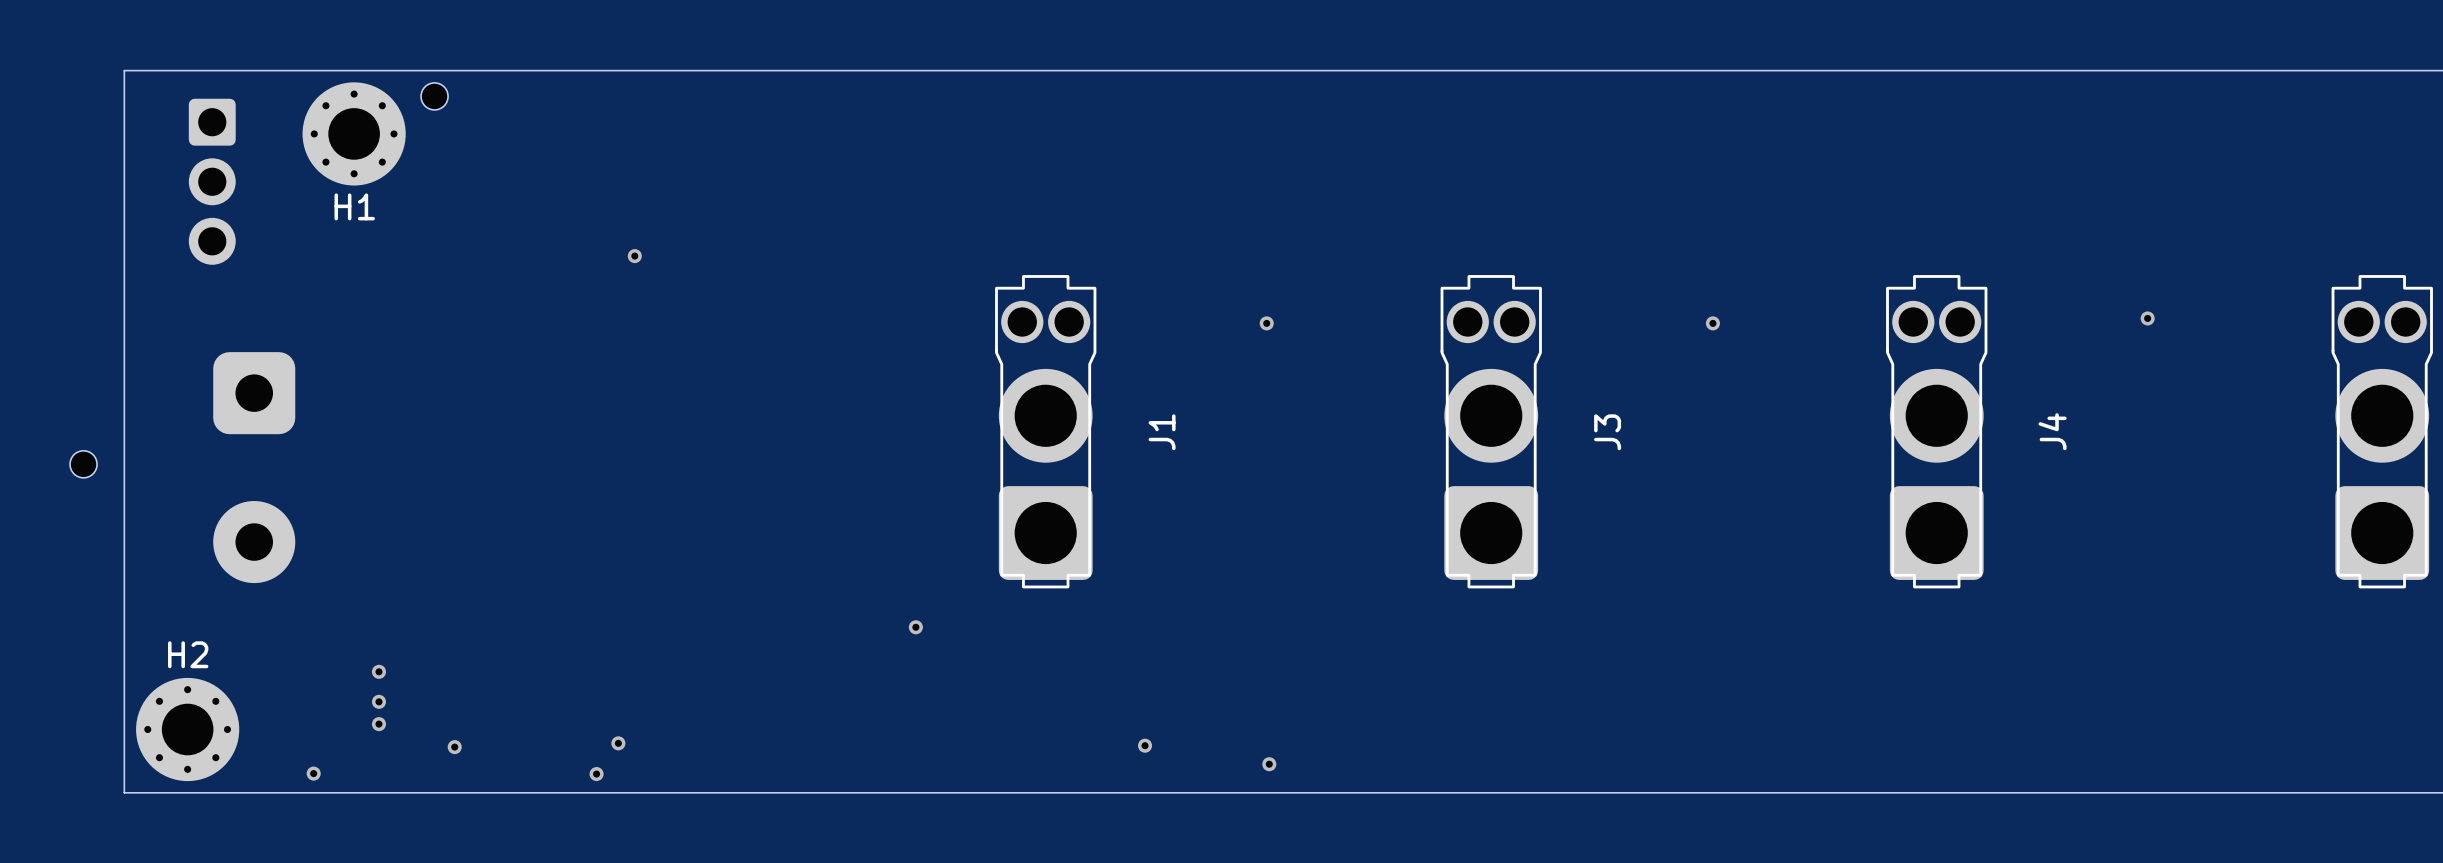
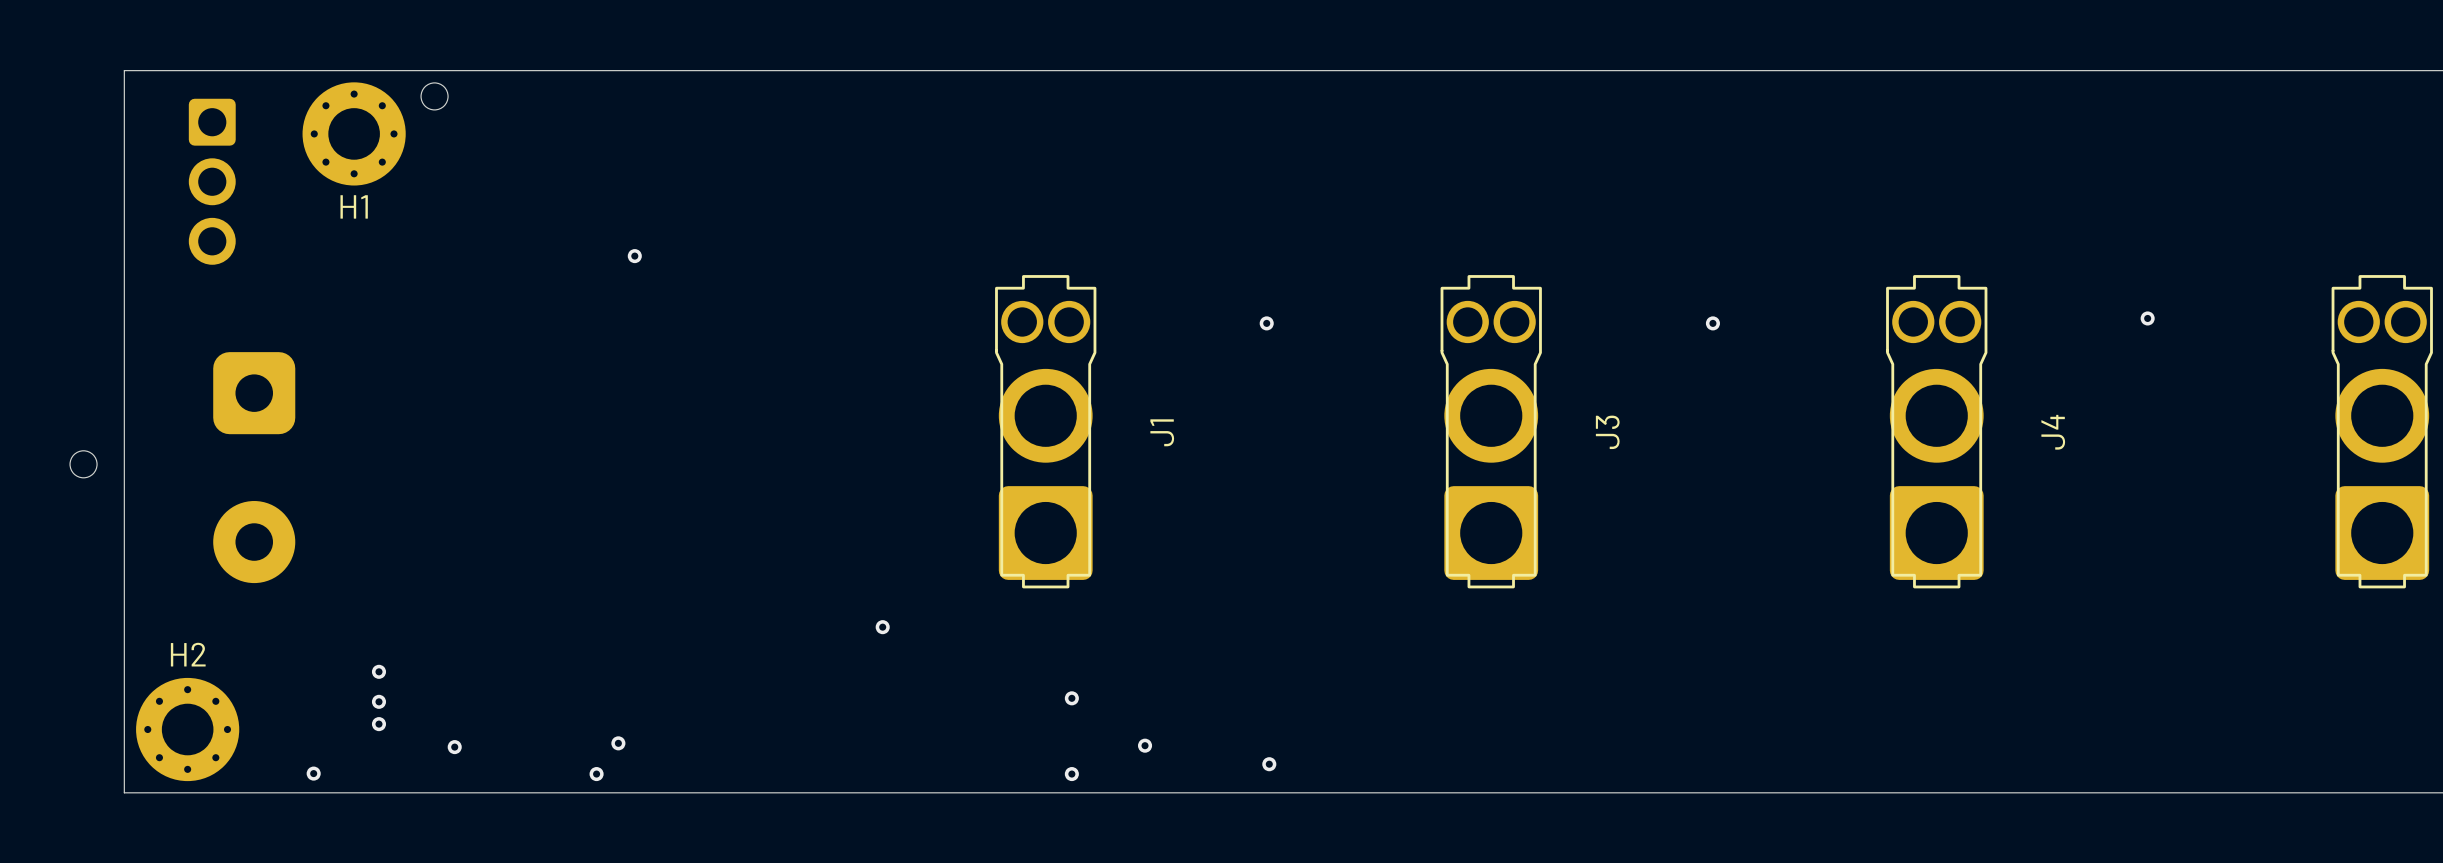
via position: (915, 627) -> (882, 627)
via: none -> (1071, 698)
via: none -> (1071, 774)

